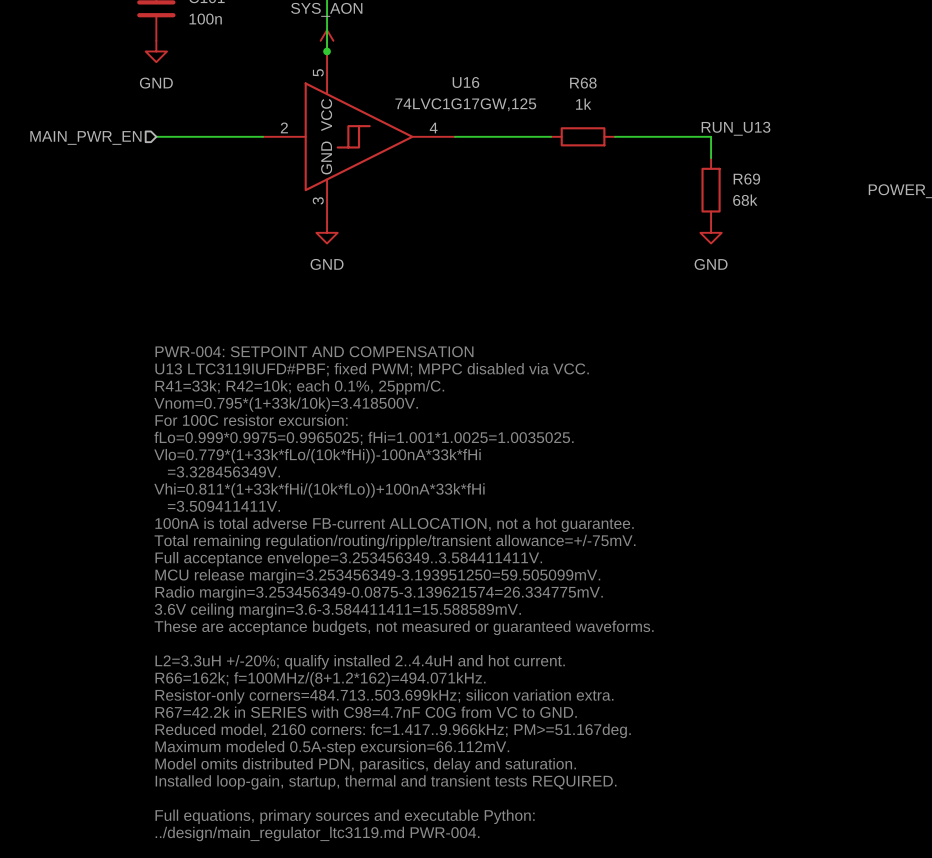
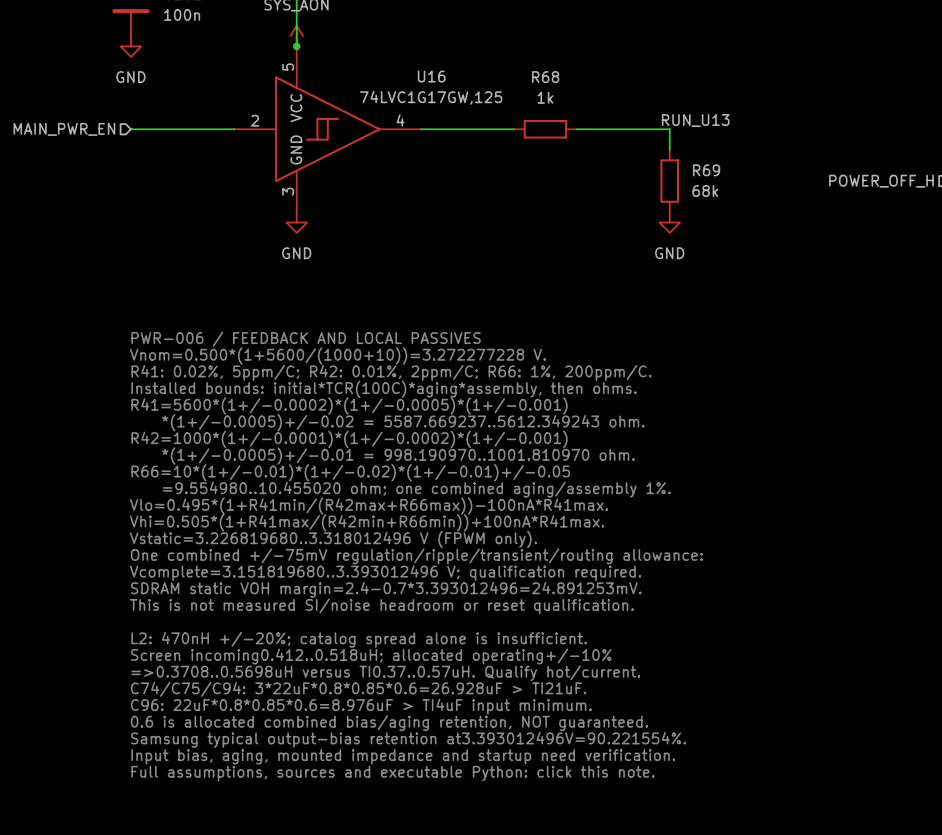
text: PWR-004: SETPOINT AND COMPENSATION (314, 351) -> PWR-006 / FEEDBACK AND LOCAL PASSIVES (306, 339)
text: U13 LTC3119IUFD#PBF; fixed PWM; MPPC disabled via VCC. (372, 369) -> Vnom=0.500*(1+5600/(1000+10))=3.272277228 V. (337, 355)
text: R41=33k; R42=10k; each 0.1%, 25ppm/C. (299, 387) -> R41: 0.02%, 5ppm/C; R42: 0.01%, 2ppm/C; R66: 1%, 200ppm/C. (391, 372)
text: Vnom=0.795*(1+33k/10k)=3.418500V. (286, 404) -> Installed bounds: initial*TCR(100C)*aging*assembly, then ohms. (384, 389)
text: For 100C resistor excursion: (251, 420) -> R41=5600*(1+/-0.0002)*(1+/-0.0005)*(1+/-0.001) (349, 406)
text: fLo=0.999*0.9975=0.9965025; fHi=1.001*1.0025=1.0035025. (364, 438) -> *(1+/-0.0005)+/-0.02 = 5587.669237..5612.349243 ohm. (403, 422)
text: Vlo=0.779*(1+33k*fLo/(10k*fHi))-100nA*33k*fHi (317, 456) -> R42=1000*(1+/-0.0001)*(1+/-0.0002)*(1+/-0.001) (349, 439)
text: =3.328456349V. (223, 471) -> *(1+/-0.0005)+/-0.01 = 998.190970..1001.810970 ohm. (398, 456)
text: Vhi=0.811*(1+33k*fHi/(10k*fLo))+100nA*33k*fHi (319, 490) -> R66=10*(1+/-0.01)*(1+/-0.02)*(1+/-0.01)+/-0.05 (350, 472)
text: =3.509411411V. (223, 506) -> =9.554980..10.455020 ohm; one combined aging/assembly 1%. (416, 489)
text: 100nA is total adverse FB-current ALLOCATION, not a hot guarantee. (394, 524) -> Vlo=0.495*(1+R41min/(R42max+R66max))-100nA*R41max. (368, 506)
text: Total remaining regulation/routing/ripple/transient allowance=+/-75mV. (395, 542) -> Vhi=0.505*(1+R41max/(R42min+R66min))+100nA*R41max. (367, 522)
text: Full acceptance envelope=3.253456349..3.584411411V. (348, 559) -> Vstatic=3.226819680..3.318012496 V (FPWM only). (333, 539)
text: MCU release margin=3.253456349-3.193951250=59.505099mV. (377, 576) -> One combined +/-75mV regulation/ripple/transient/routing allowance: (416, 556)
text: Radio margin=3.253456349-0.0875-3.139621574=26.334775mV. (379, 593) -> Vcomplete=3.151819680..3.393012496 V; qualification required. (385, 573)
text: 3.6V ceiling margin=3.6-3.584411411=15.588589mV. (337, 610) -> SDRAM static VOH margin=2.4-0.7*3.393012496=24.891253mV. (386, 589)
text: These are acceptance budgets, not measured or guaranteed waveforms. (404, 627) -> This is not measured SI/noise headroom or reset qualification. (381, 606)
text: L2=3.3uH +/-20%; qualify installed 2..4.4uH and hot current. (360, 662) -> L2: 470nH +/-20%; catalog spread alone is insufficient. (359, 639)
text: R66=162k; f=100MHz/(8+1.2*162)=494.071kHz. (320, 679) -> Screen incoming0.412..0.518uH; allocated operating+/-10% (371, 656)
text: Resistor-only corners=484.713..503.699kHz; silicon variation extra. (384, 696) -> =>0.3708..0.5698uH versus TI0.37..0.57uH. Qualify hot/current. (385, 673)
text: R67=42.2k in SERIES with C98=4.7nF C0G from VC to GND. (366, 712) -> C74/C75/C94: 3*22uF*0.8*0.85*0.6=26.928uF > TI21uF. (358, 689)
text: Reduced model, 2160 corners: fc=1.417..9.966kHz; PM>=51.167deg. (393, 730) -> C96: 22uF*0.8*0.85*0.6=8.976uF > TI4uF input minimum. (361, 706)
text: Maximum modeled 0.5A-step excursion=66.112mV. (332, 748) -> 0.6 is allocated combined bias/aging retention, NOT guaranteed. (389, 723)
text: Model omits distributed PDN, parasitics, delay and saturation. (365, 765) -> Samsung typical output-bias retention at3.393012496V=90.221554%. (408, 739)
text: Installed loop-gain, startup, thermal and transient tests REQUIRED. (386, 782) -> Input bias, aging, mounted impedance and startup need verification. (403, 756)
text: Full equations, primary sources and executable Python: (345, 816) -> Full assumptions, sources and executable Python: click this note. (392, 773)
text: ../design/main_regulator_ltc3119.md PWR-004. (317, 833) -> none

